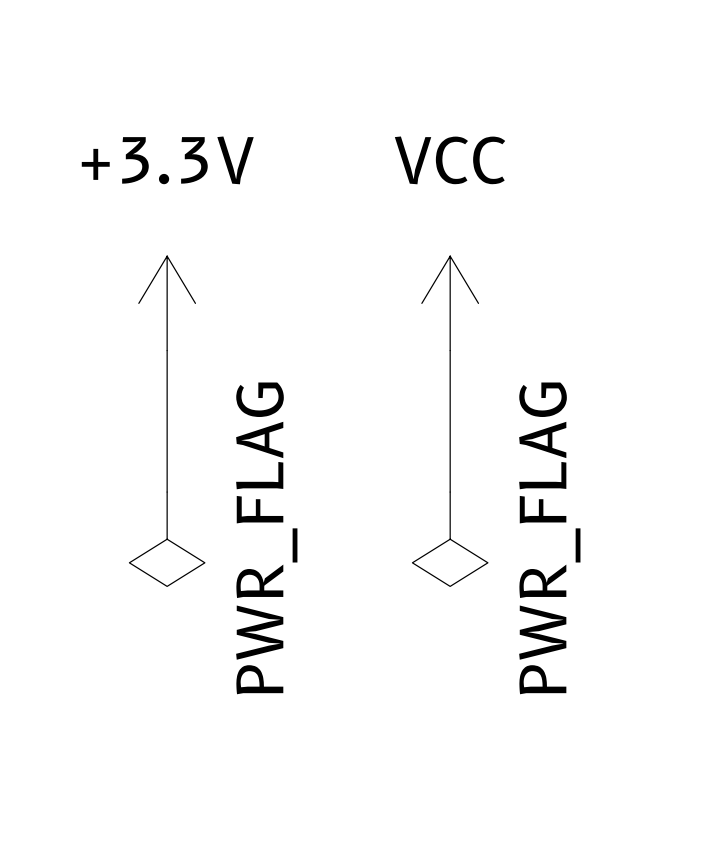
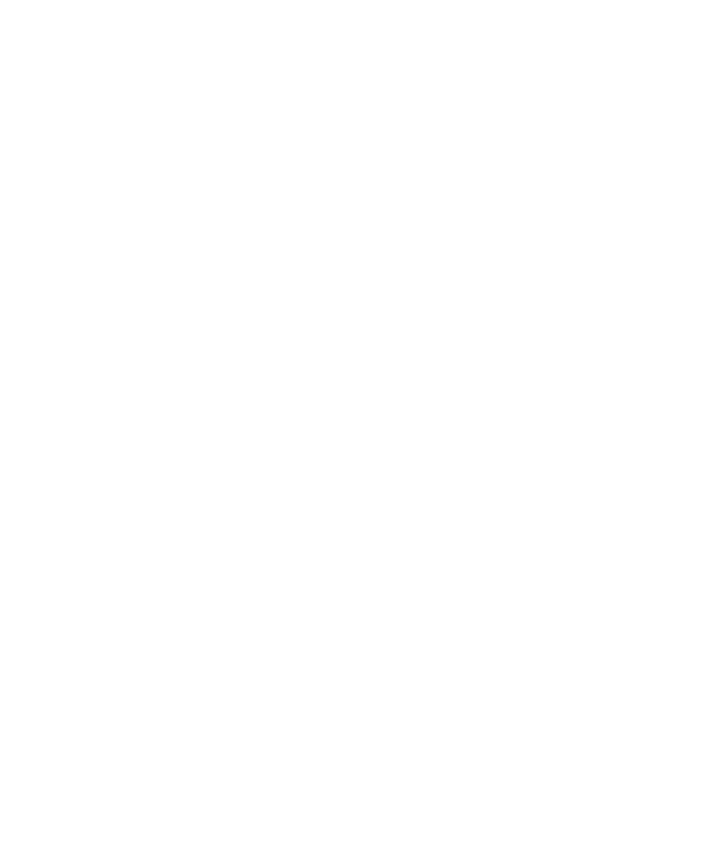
power symbol: +3.3V (167, 303) -> none
power symbol: VCC (450, 303) -> none
wire: (167, 350) (167, 492) -> none
wire: (450, 350) (450, 492) -> none
power symbol: PWR_FLAG (167, 539) -> none
power symbol: PWR_FLAG (450, 539) -> none

